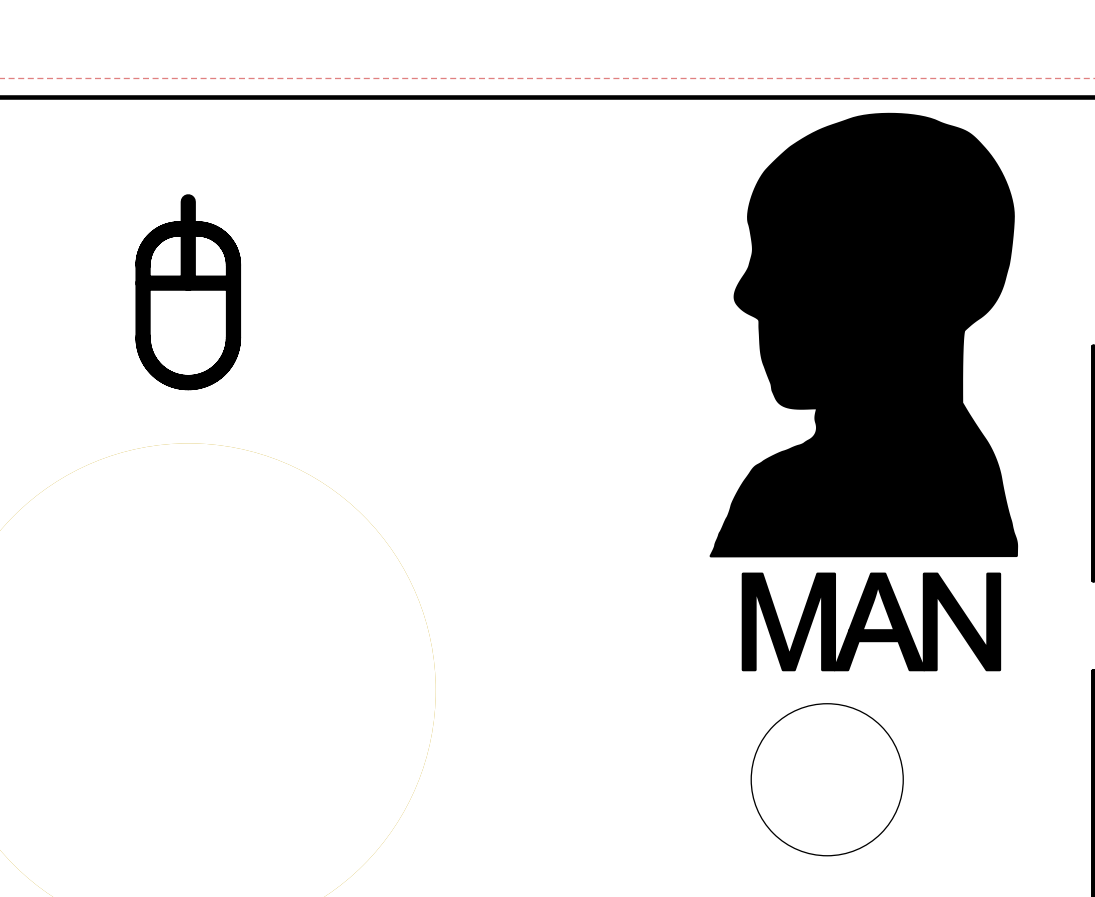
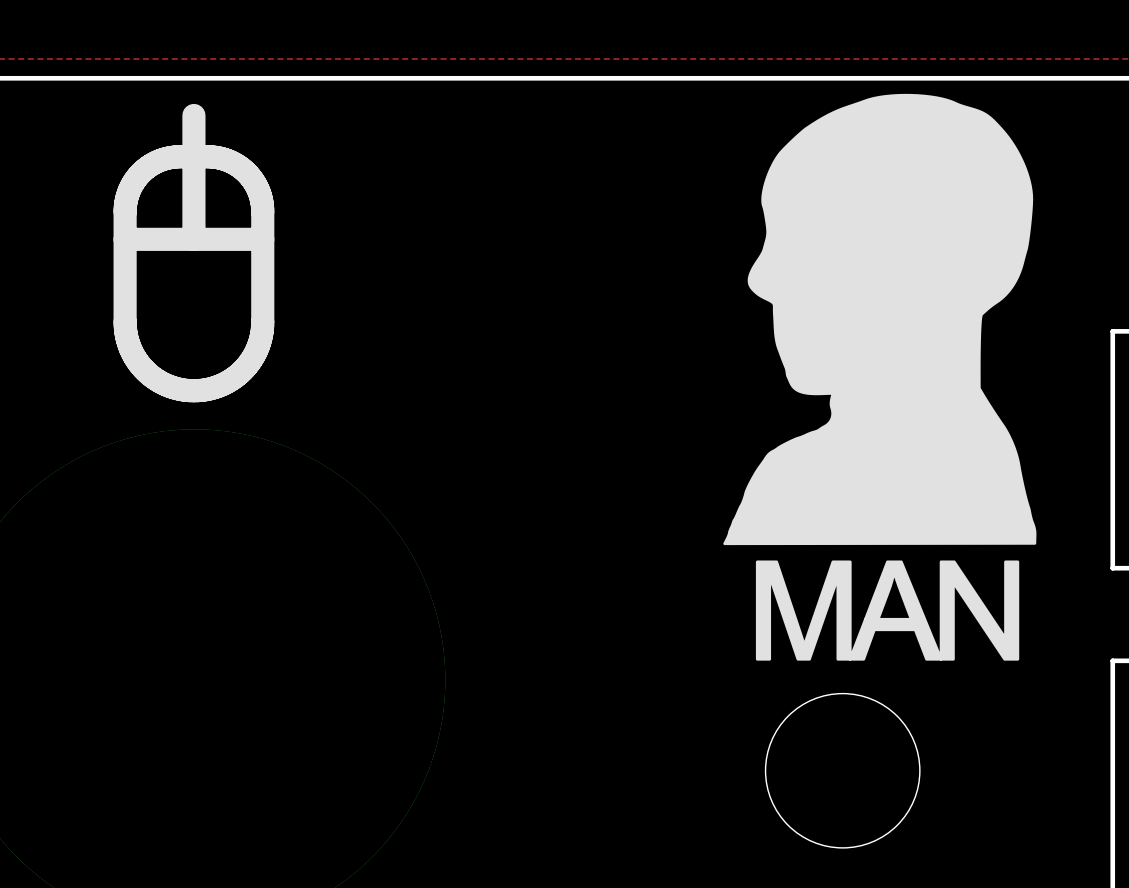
line: none -> (193, 115) (193, 239)
line: none -> (180, 156) (216, 157) (236, 164) (246, 172) (254, 183) (262, 206) (262, 321) (259, 342) (251, 360) (237, 375) (220, 385) (201, 390) (173, 387) (150, 375) (133, 354) (125, 328) (125, 211) (127, 195) (134, 181) (147, 167) (163, 159) (180, 156)
line: (188, 201) (188, 283) -> none
line: (175, 229) (201, 229) (214, 233) (227, 244) (233, 261) (233, 337) (231, 350) (225, 362) (217, 372) (205, 379) (192, 382) (174, 380) (159, 372) (148, 358) (143, 342) (144, 254) (149, 244) (156, 237) (165, 231) (175, 229) -> none
line: none -> (125, 239) (262, 239)
line: (143, 283) (233, 283) -> none

